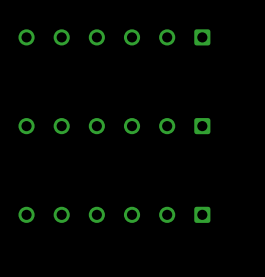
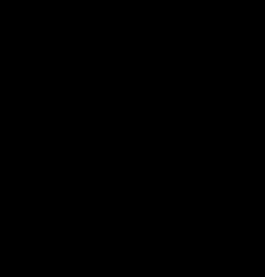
part: (114, 37) -> none
part: (114, 126) -> none
part: (114, 214) -> none

